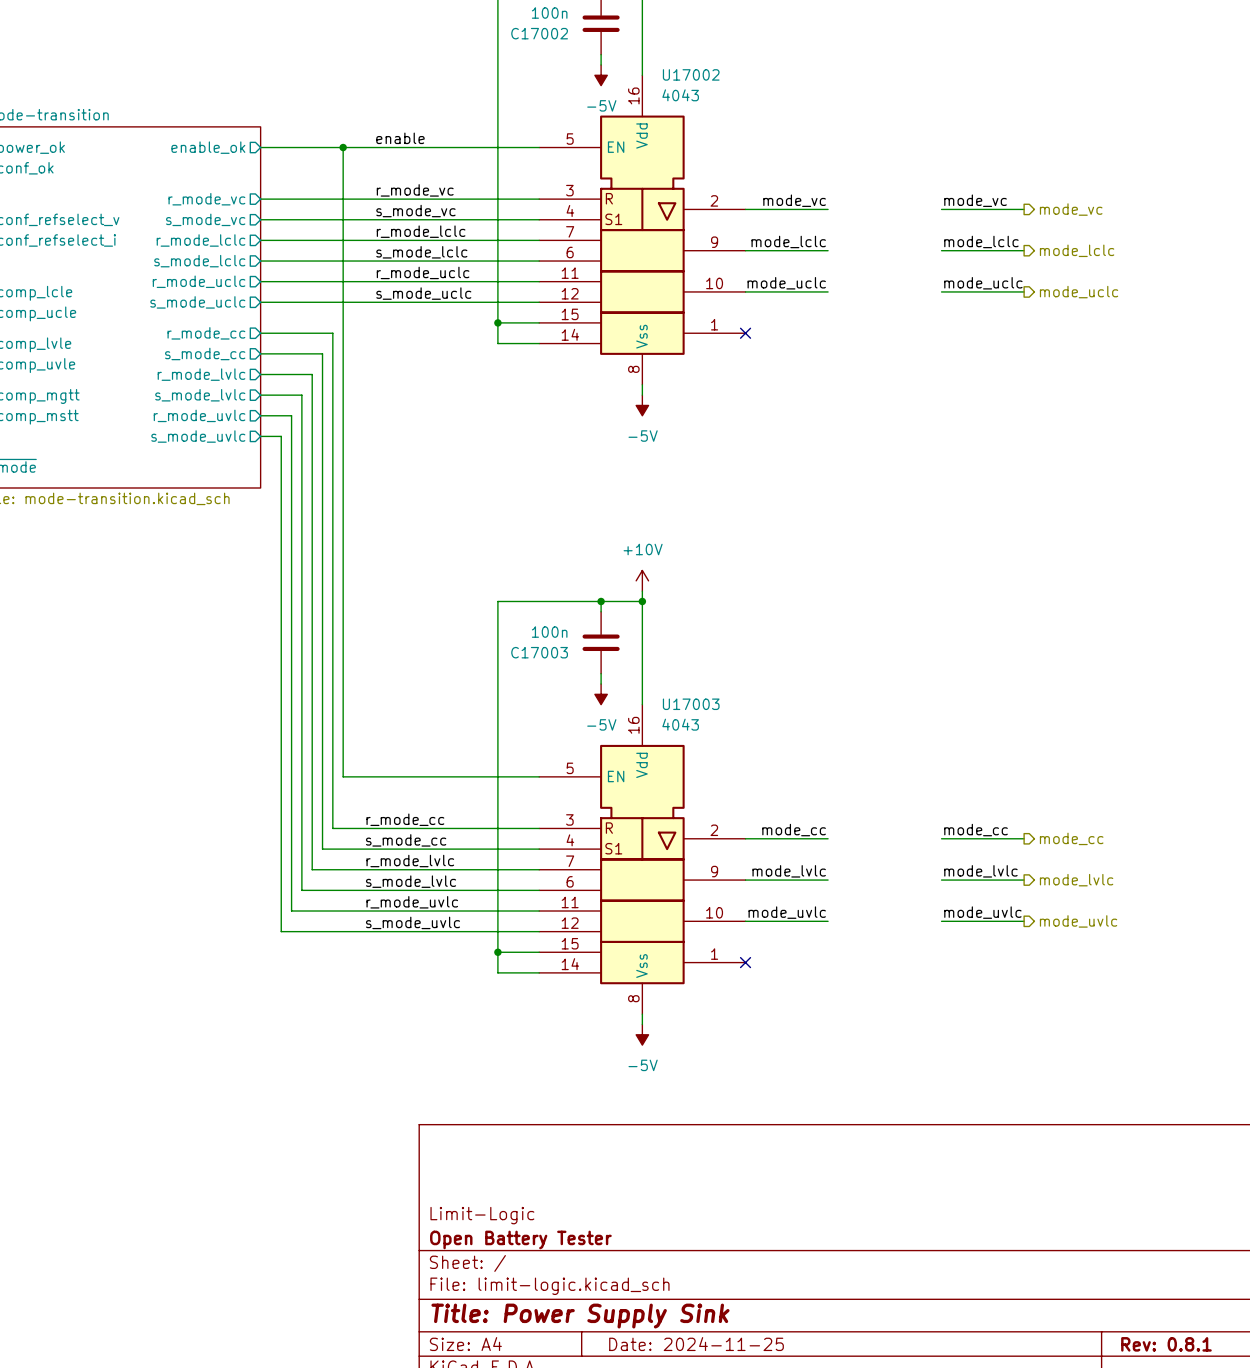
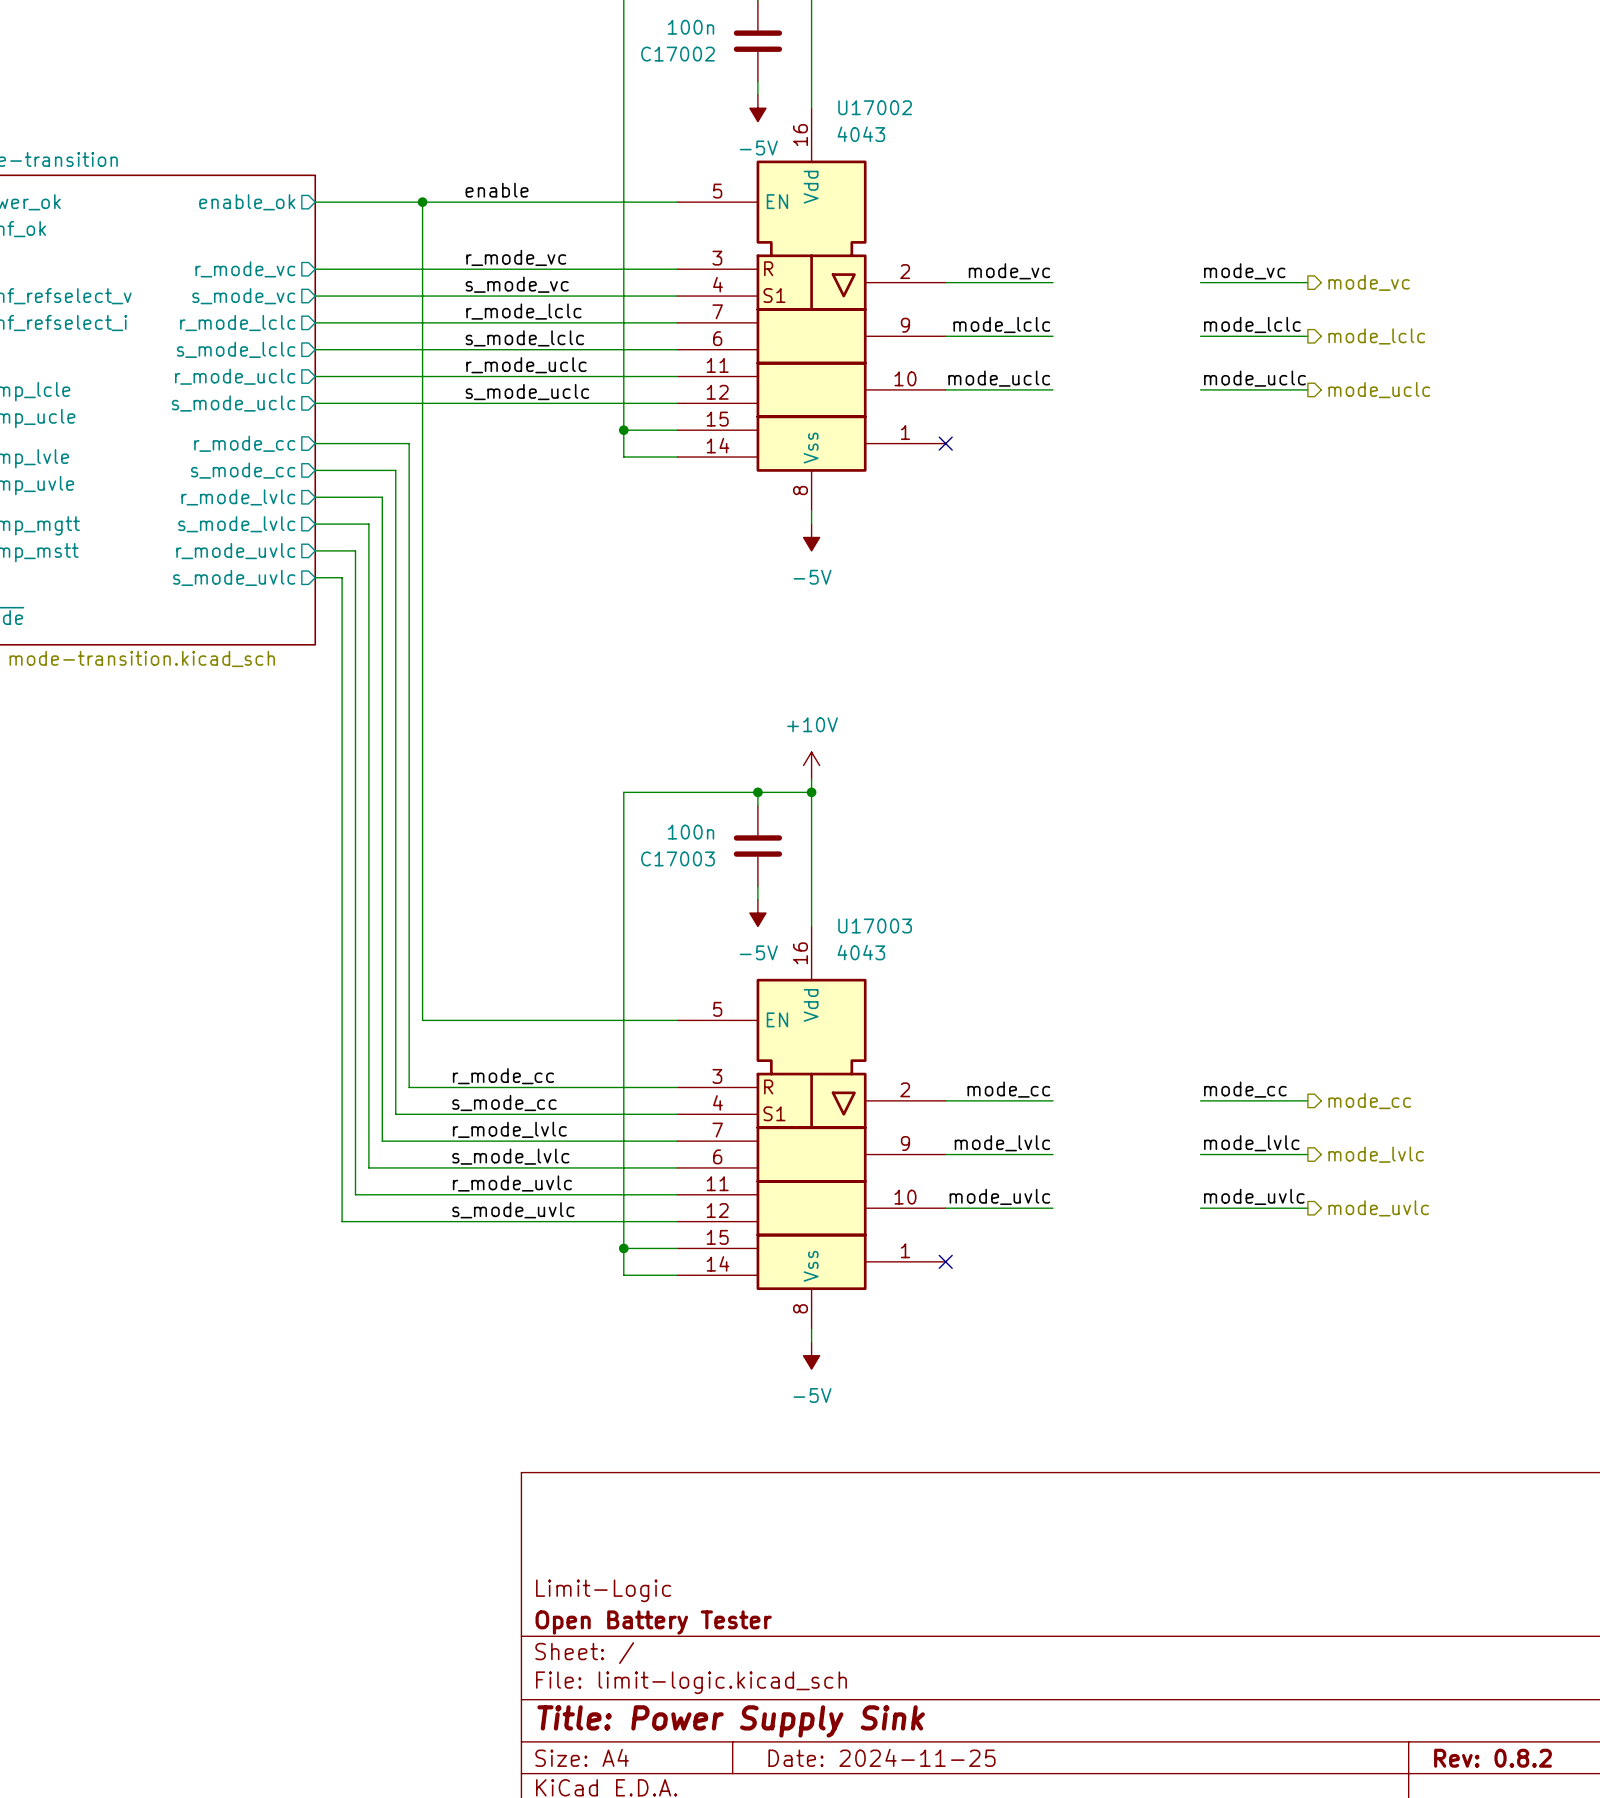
title block: Rev: 0.8.1 (1166, 1344) -> Rev: 0.8.2 (1492, 1758)

